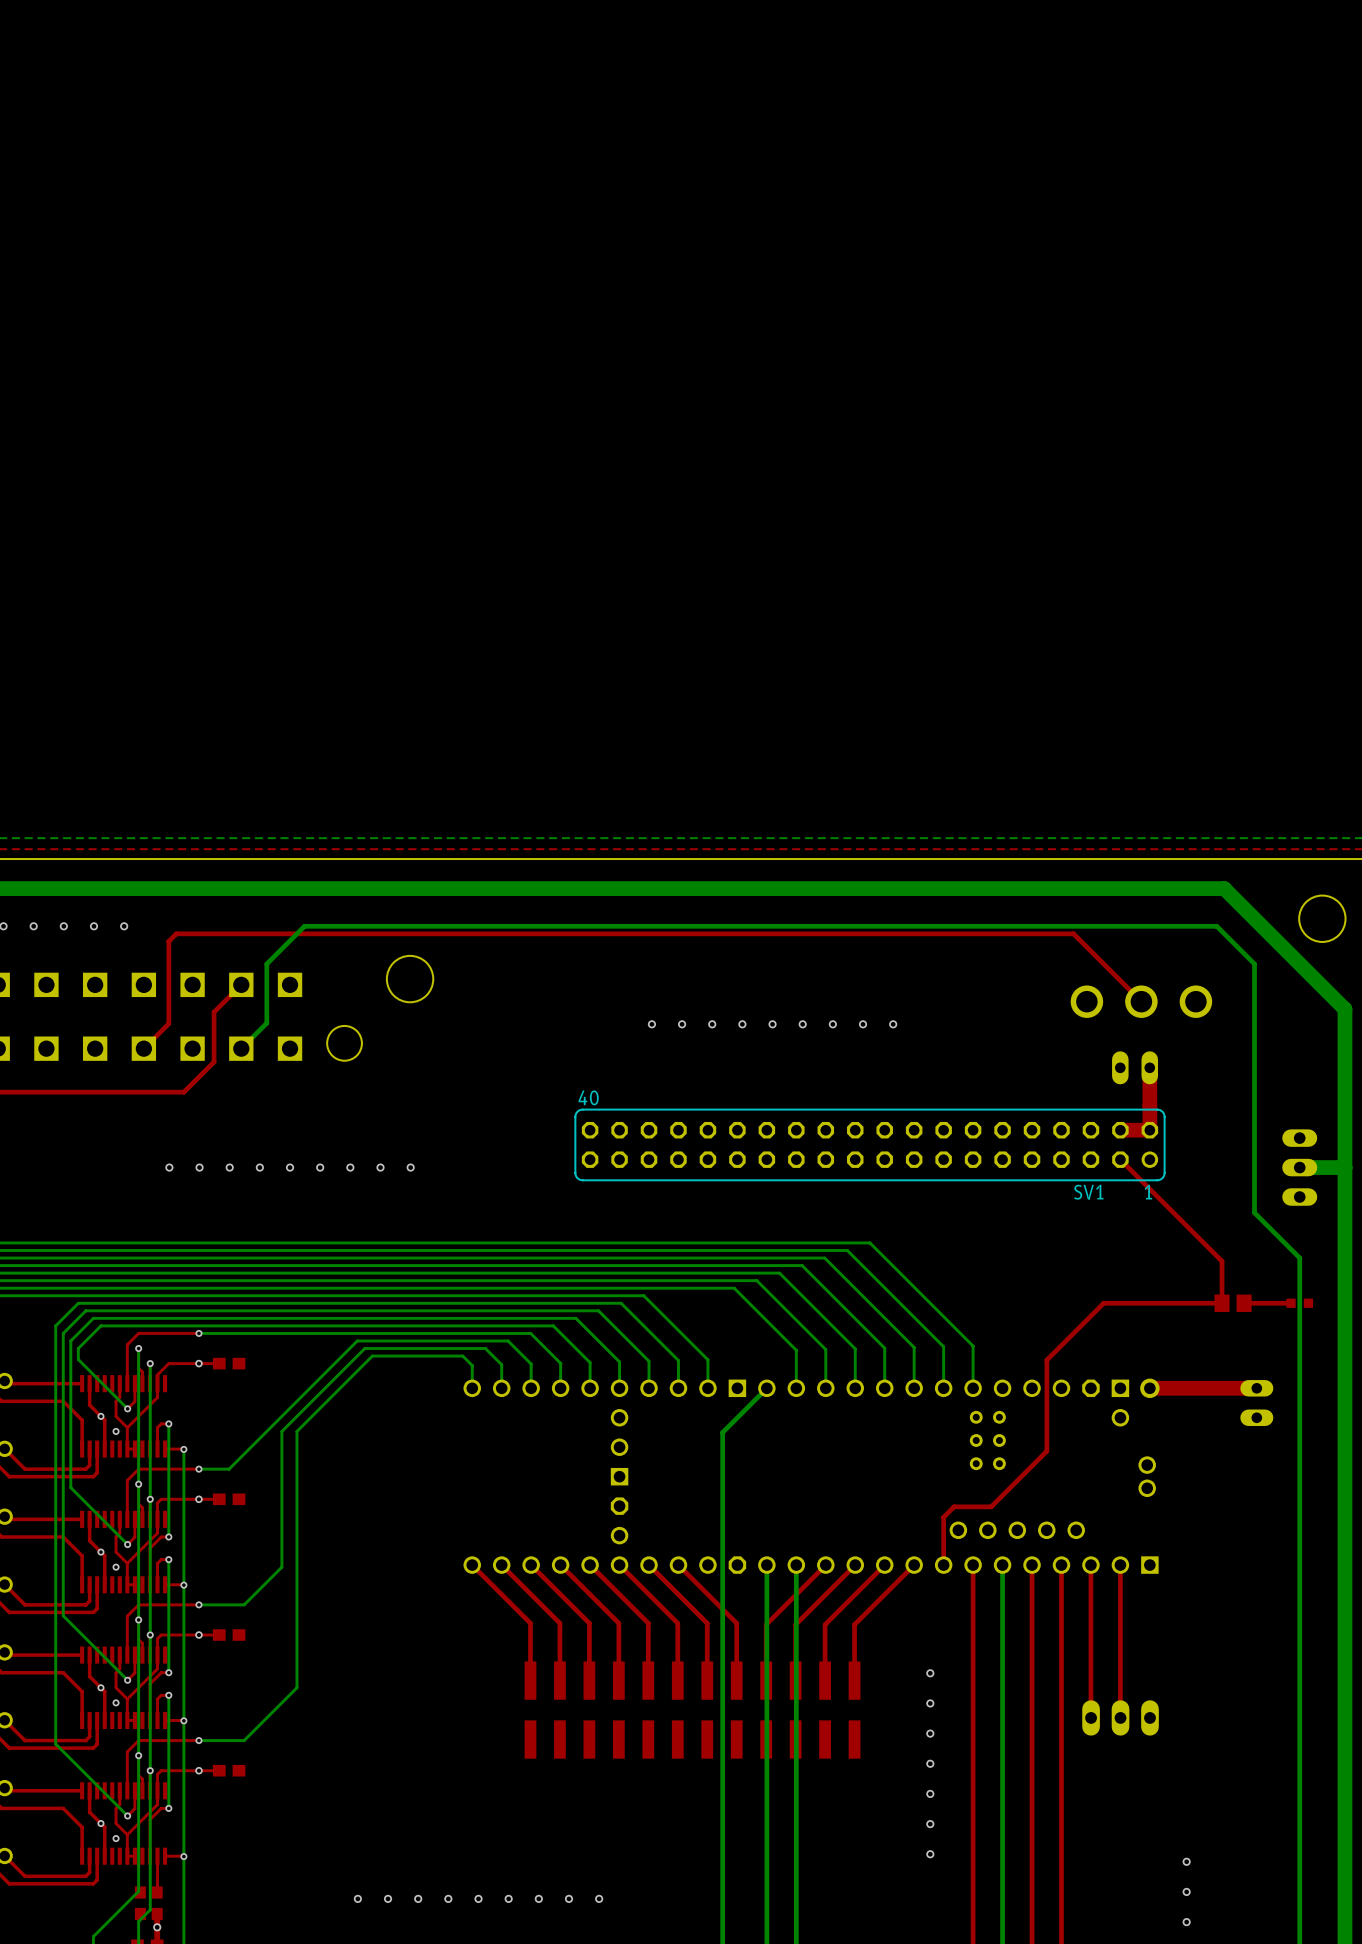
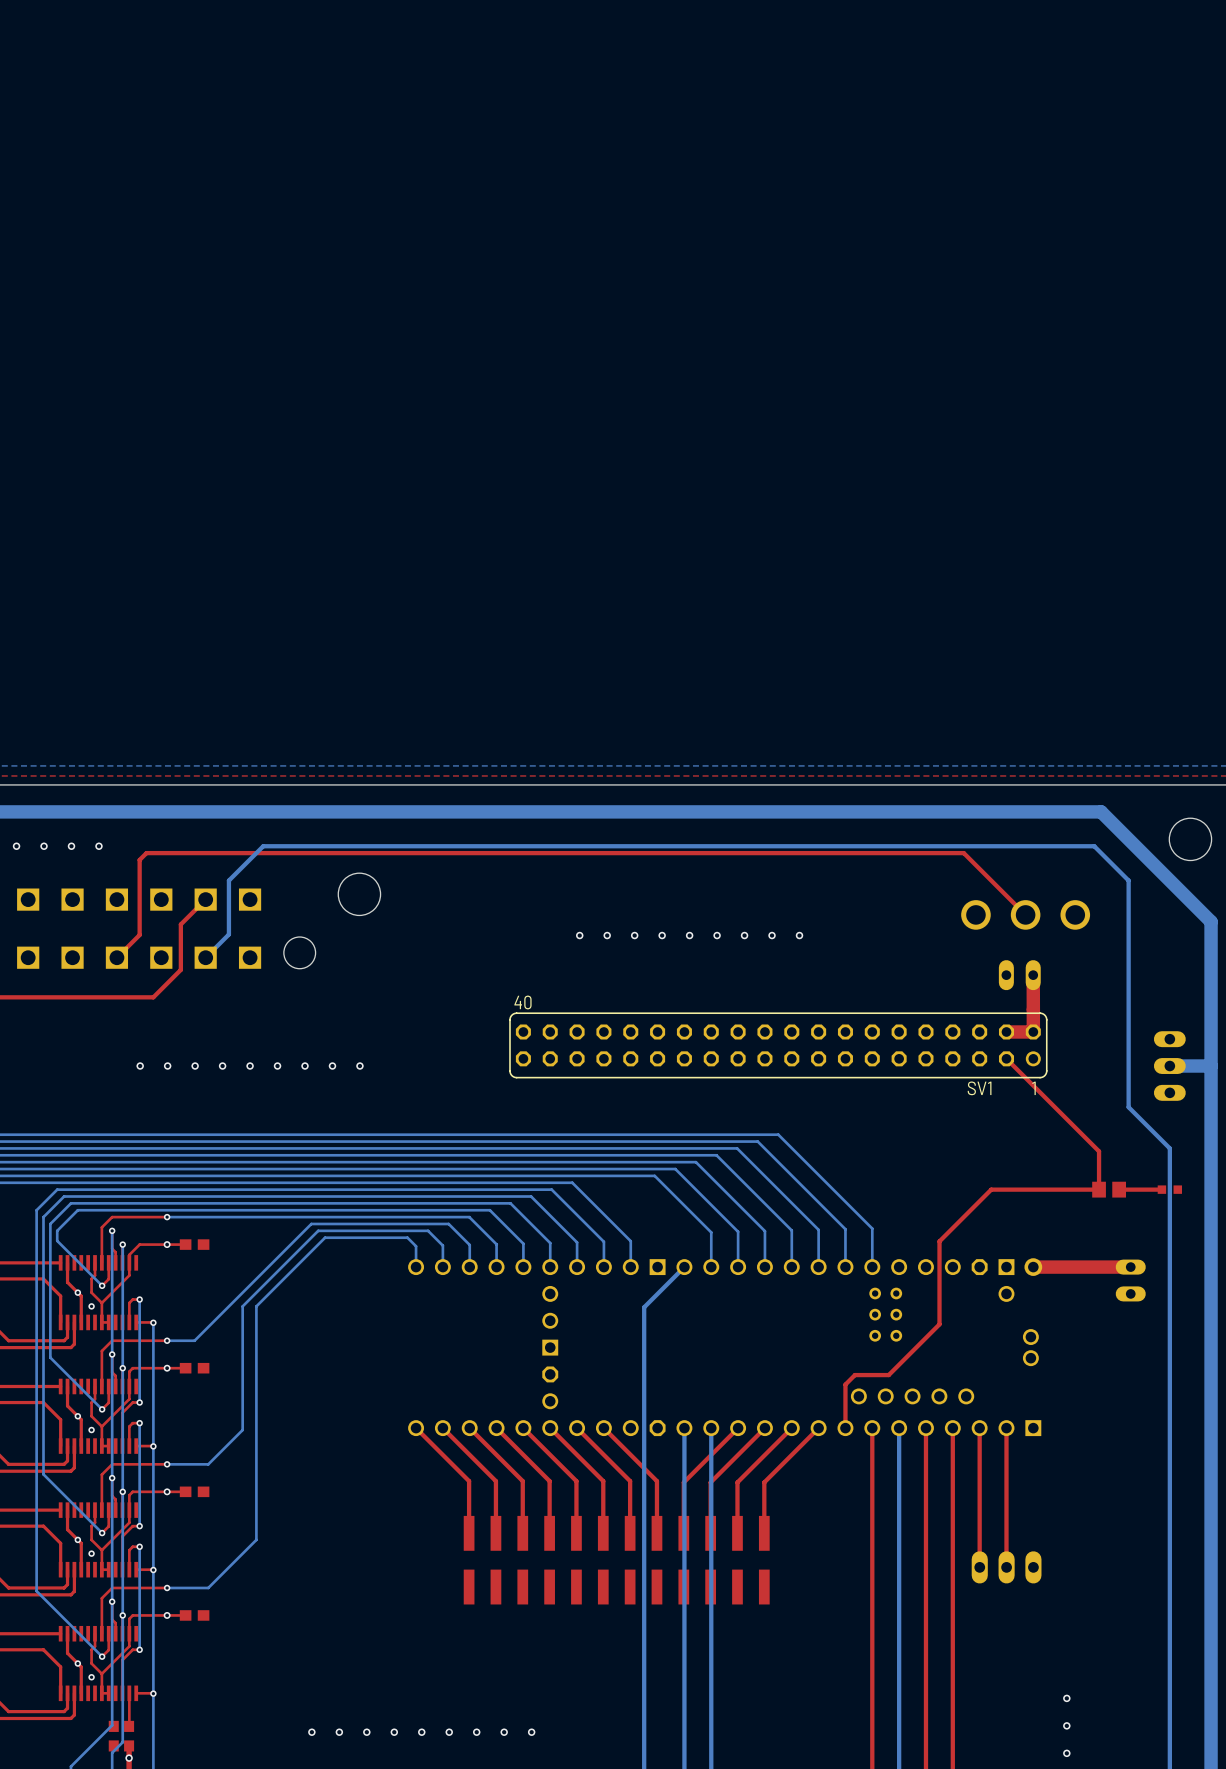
via: (930, 1673) -> none
via: (930, 1703) -> none
via: (930, 1733) -> none
via: (930, 1763) -> none
via: (930, 1793) -> none
via: (930, 1824) -> none
via: (930, 1854) -> none

